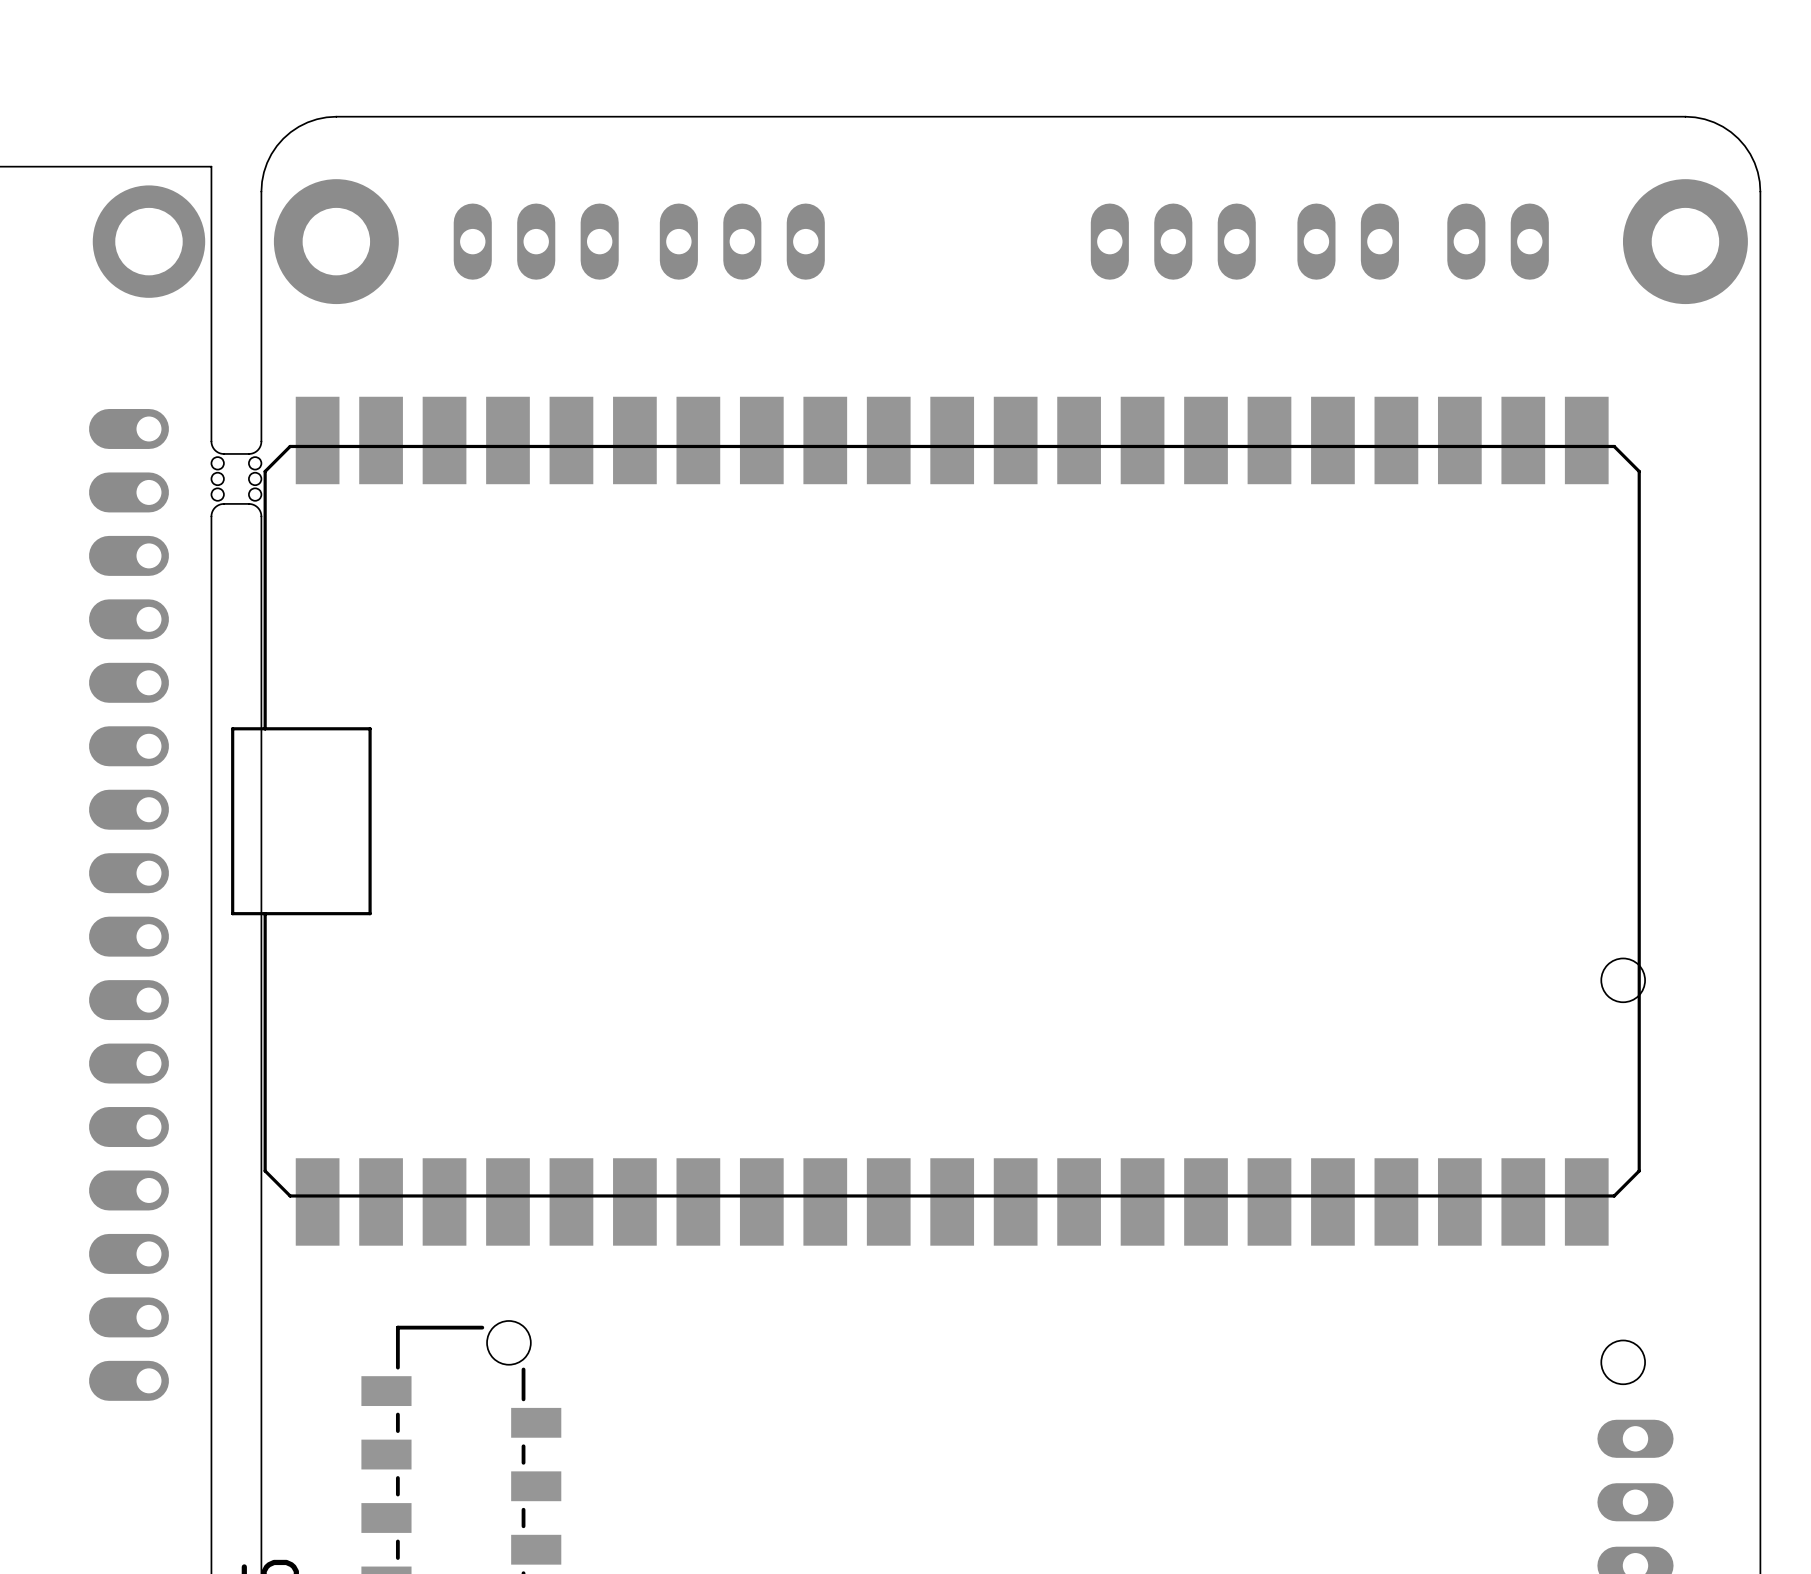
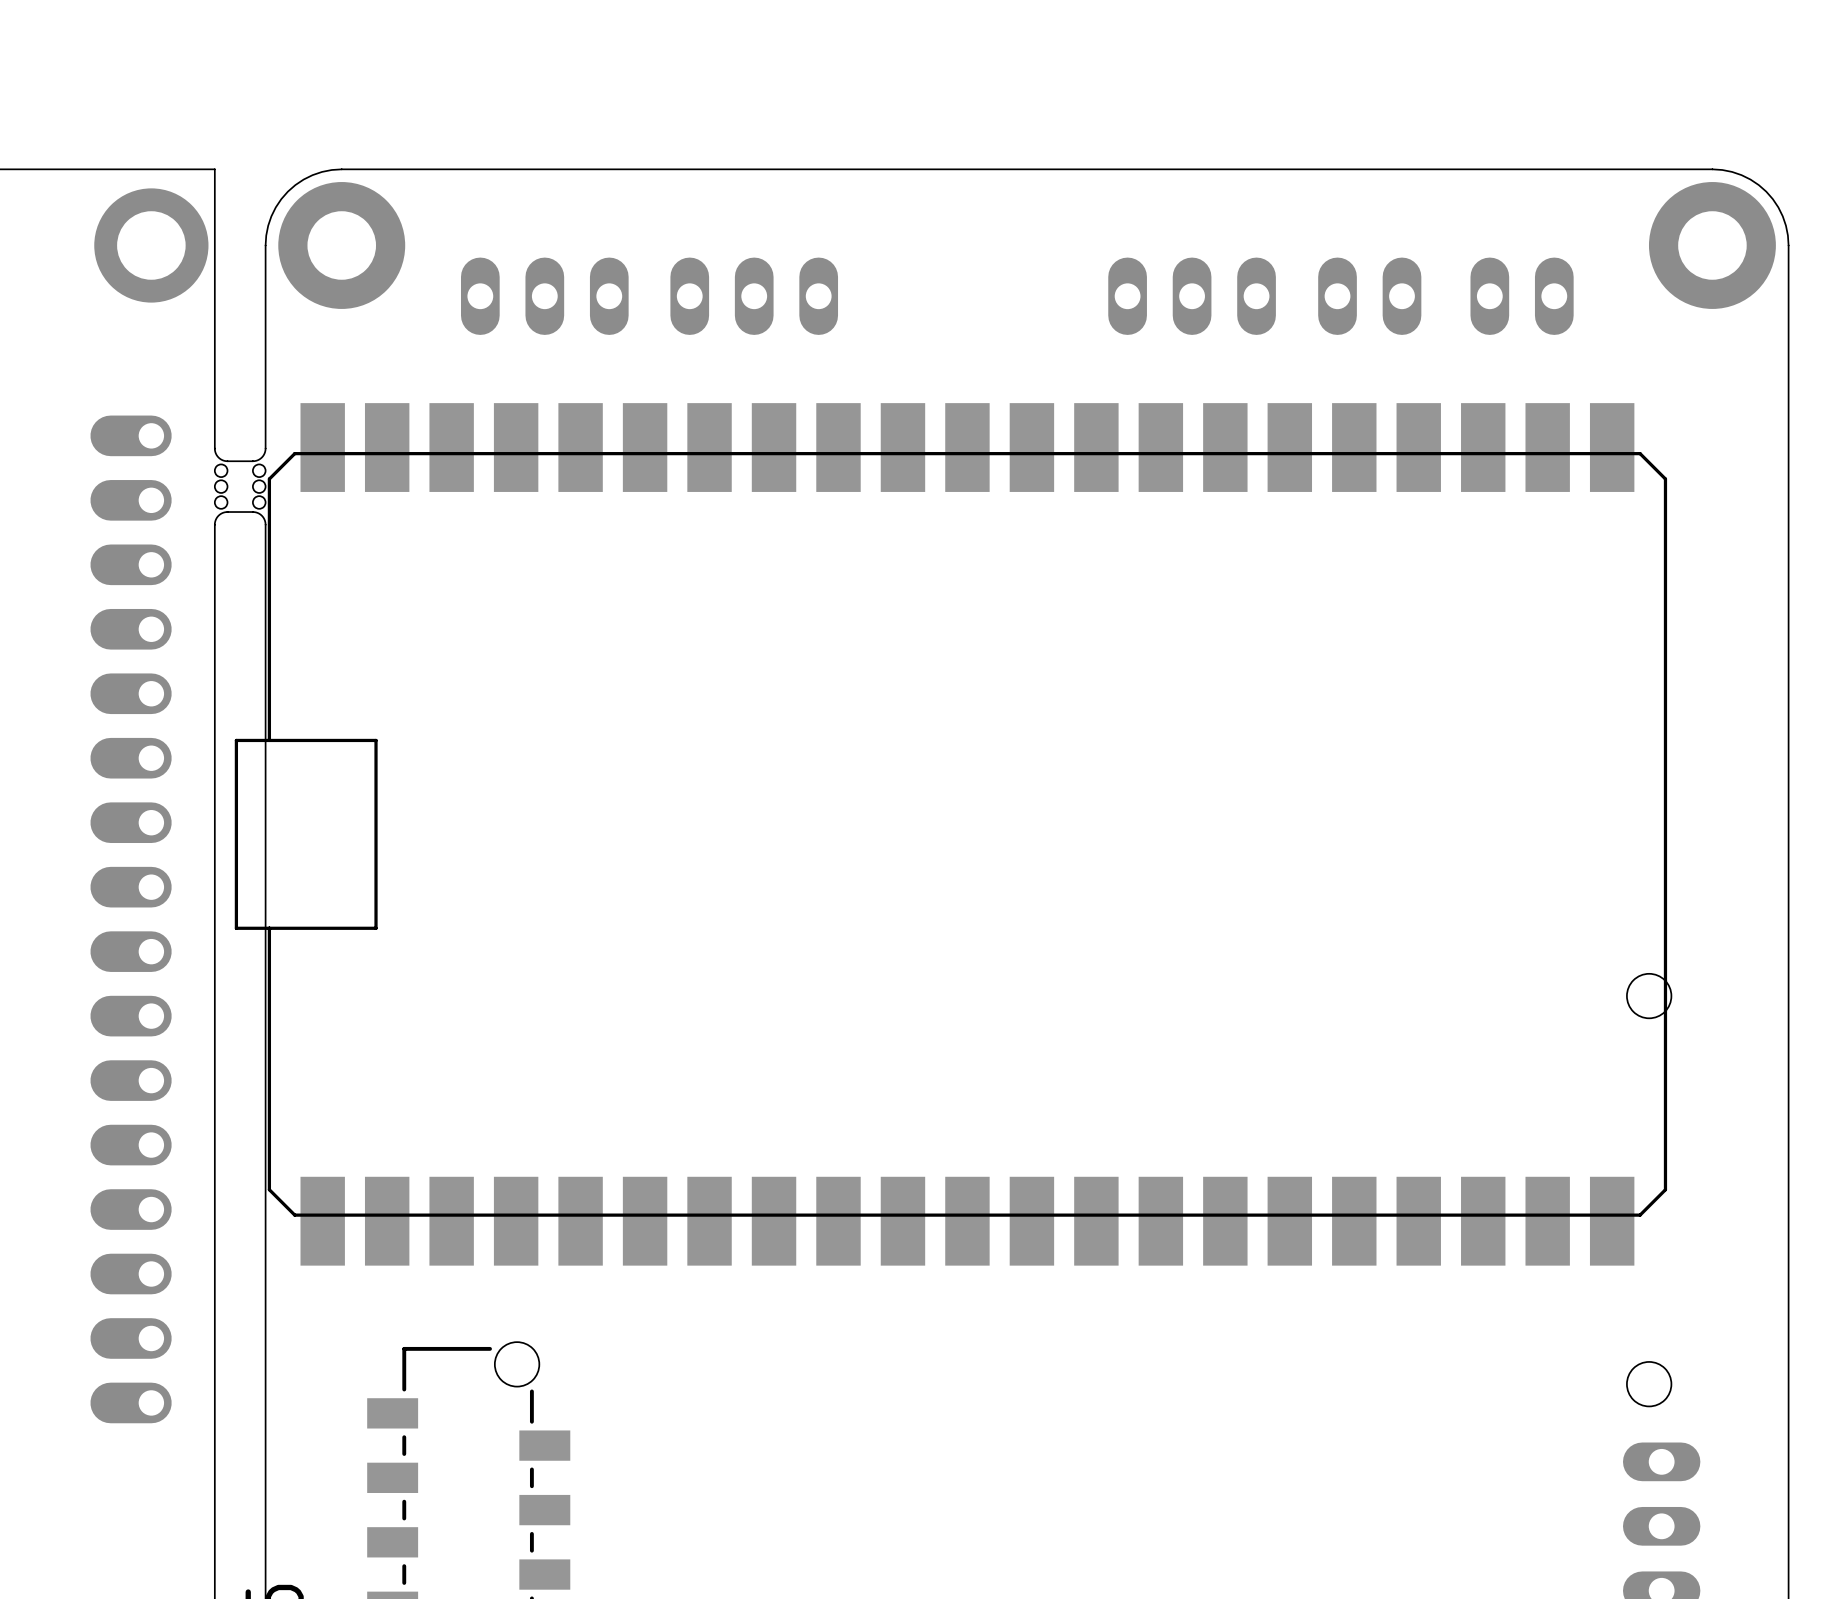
part position: (536, 241) -> (544, 296)
part position: (742, 241) -> (754, 296)
part position: (1173, 241) -> (1192, 296)
part position: (1348, 241) -> (1369, 296)
part position: (1498, 241) -> (1522, 296)
board edge: (1760, 241) (1759, 181) (1750, 154) (1738, 138) (1722, 126) (1704, 119) (1685, 116) (326, 117) (307, 122) (290, 132) (271, 154) (262, 181) (261, 241) -> (1788, 245) (1782, 216) (1766, 191) (1741, 175) (1712, 169) (341, 169) (312, 175) (287, 191) (271, 216) (265, 245)

